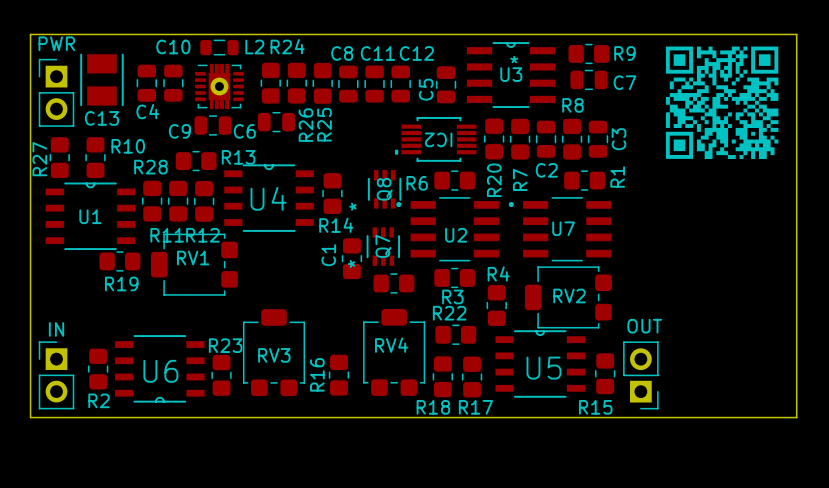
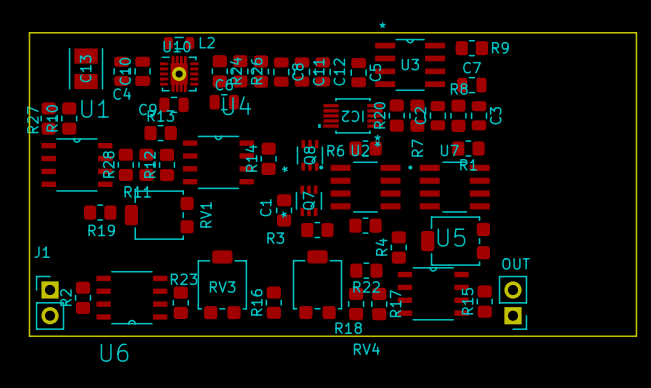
C10 name rotation: 0° (173, 46) -> 90° counterclockwise (125, 71)
R24 name rotation: 0° (287, 46) -> 90° counterclockwise (235, 70)
drawing: [665, 46, 779, 160] -> none
U10 name: none -> U10 (176, 46)
C8 name rotation: 0° (342, 53) -> 90° counterclockwise (297, 72)
C8 name position: C8 (342, 53) -> C8 (297, 72)
C11 name rotation: 0° (377, 53) -> 90° counterclockwise (318, 72)
C12 name rotation: 0° (416, 53) -> 90° counterclockwise (339, 72)
U3 text position: * (514, 59) -> * (382, 25)
C7 position: (588, 79) -> (471, 85)
C7 name position: C7 (624, 82) -> C7 (472, 67)
C5 name position: C5 (426, 89) -> C5 (375, 72)
PWR: (56, 92) -> none
IC2 footprint: [394, 117, 477, 162] -> [318, 98, 383, 134]
C13 name rotation: 0° (101, 118) -> 90° counterclockwise (85, 68)
text: R25 (324, 124) -> none
R26 name position: R26 (306, 125) -> R26 (256, 71)
C6 name position: C6 (244, 131) -> C6 (224, 84)
R10 name rotation: 0° (128, 146) -> 90° counterclockwise (52, 118)
R10 name position: R10 (128, 146) -> R10 (52, 118)
R27 position: (59, 157) -> (48, 118)
R10 position: (95, 157) -> (69, 118)
R13 name position: R13 (238, 157) -> R13 (160, 115)
R28 name rotation: 0° (150, 167) -> 90° counterclockwise (108, 164)
C2 name rotation: 0° (546, 170) -> 90° counterclockwise (420, 115)
C2 name position: C2 (546, 170) -> C2 (420, 115)
R1 name rotation: 0° (617, 177) -> 90° clockwise (468, 164)
R1 name position: R1 (617, 177) -> R1 (468, 164)
R20 name position: R20 (494, 180) -> R20 (379, 115)
U4 name position: U4 (268, 198) -> U4 (236, 105)
U1: none -> (76, 164)
part: (90, 216) -> none
text: U1 (90, 216) -> none
R14 name rotation: 0° (336, 225) -> 90° counterclockwise (251, 158)
U7 name position: U7 (563, 228) -> U7 (449, 150)
R12 name rotation: 0° (202, 235) -> 90° counterclockwise (149, 164)
U2 name position: U2 (456, 235) -> U2 (360, 150)
RV1 name rotation: 0° (193, 258) -> 90° counterclockwise (205, 214)
RV1 name position: RV1 (193, 258) -> RV1 (205, 214)
R4 name rotation: 0° (498, 273) -> 90° counterclockwise (381, 247)
R4 name position: R4 (498, 273) -> R4 (381, 247)
text: RV2 (569, 295) -> none
R3 name position: R3 (452, 296) -> R3 (275, 238)
R22 name position: R22 (449, 313) -> R22 (366, 287)
IN name: IN (56, 329) -> J1 (42, 252)
RV4 name position: RV4 (391, 345) -> RV4 (366, 349)
U5 name position: U5 (543, 368) -> U5 (451, 237)
U6 name position: U6 (160, 371) -> U6 (114, 352)
R2 name rotation: 0° (99, 400) -> 90° counterclockwise (65, 297)
R2 name position: R2 (99, 400) -> R2 (65, 297)
R17 name rotation: 0° (475, 407) -> 90° counterclockwise (395, 303)
R15 name rotation: 0° (595, 407) -> 90° counterclockwise (467, 301)

